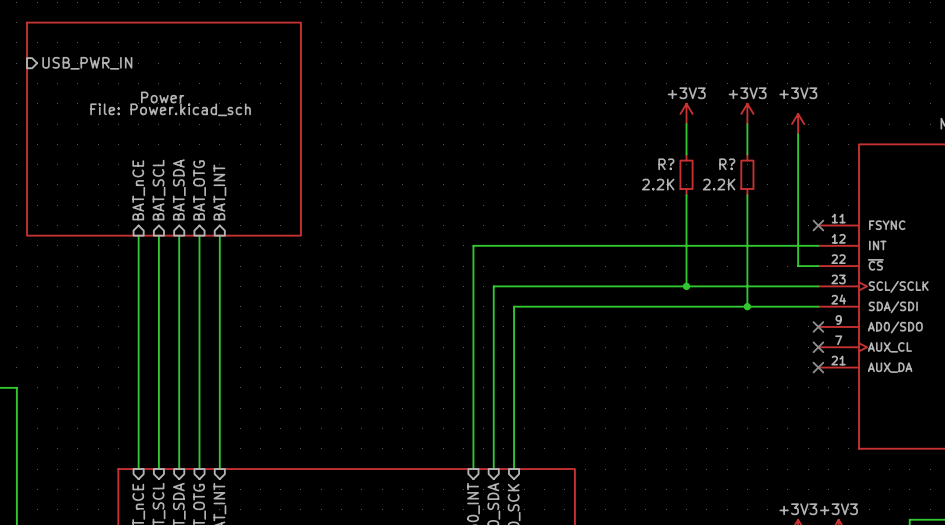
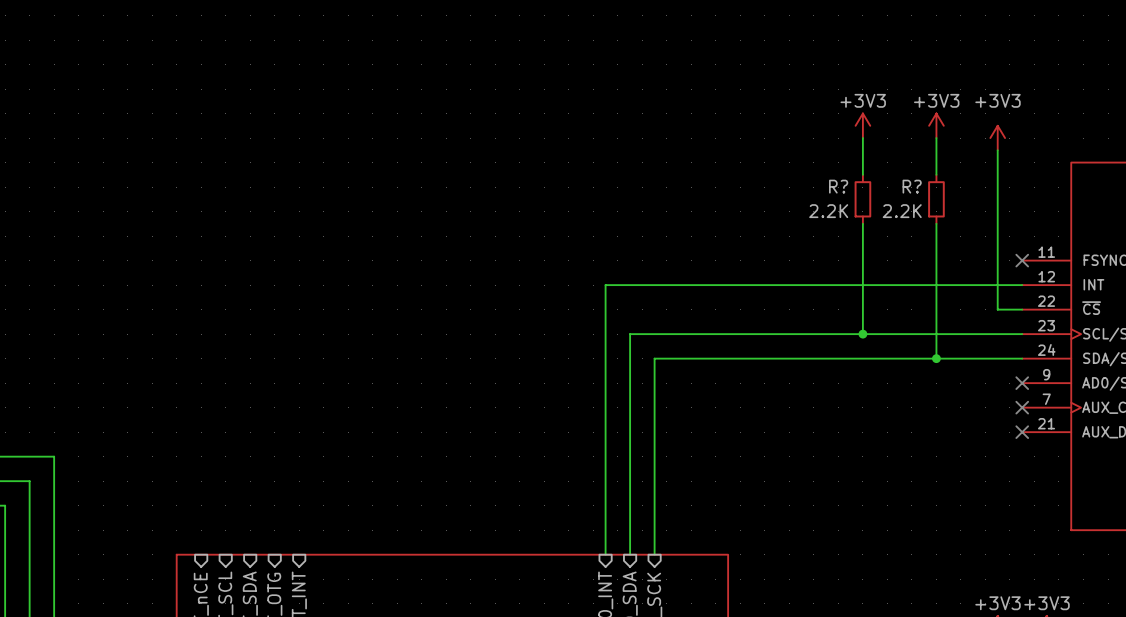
sheet pin: USB_PWR_IN (87, 63) -> none
sheet Power: File: Power.kicad_sch (163, 129) -> none
sheet pin: BAT_SDA (179, 189) -> none
sheet pin: BAT_nCE (138, 190) -> none
sheet pin: BAT_SCL (159, 190) -> none
sheet pin: BAT_OTG (199, 190) -> none
sheet pin: BAT_INT (219, 192) -> none
wire: (138, 235) (138, 469) -> none
wire: (158, 235) (158, 469) -> none
wire: (179, 235) (179, 469) -> none
wire: (199, 235) (199, 469) -> none
wire: (219, 235) (219, 469) -> none

